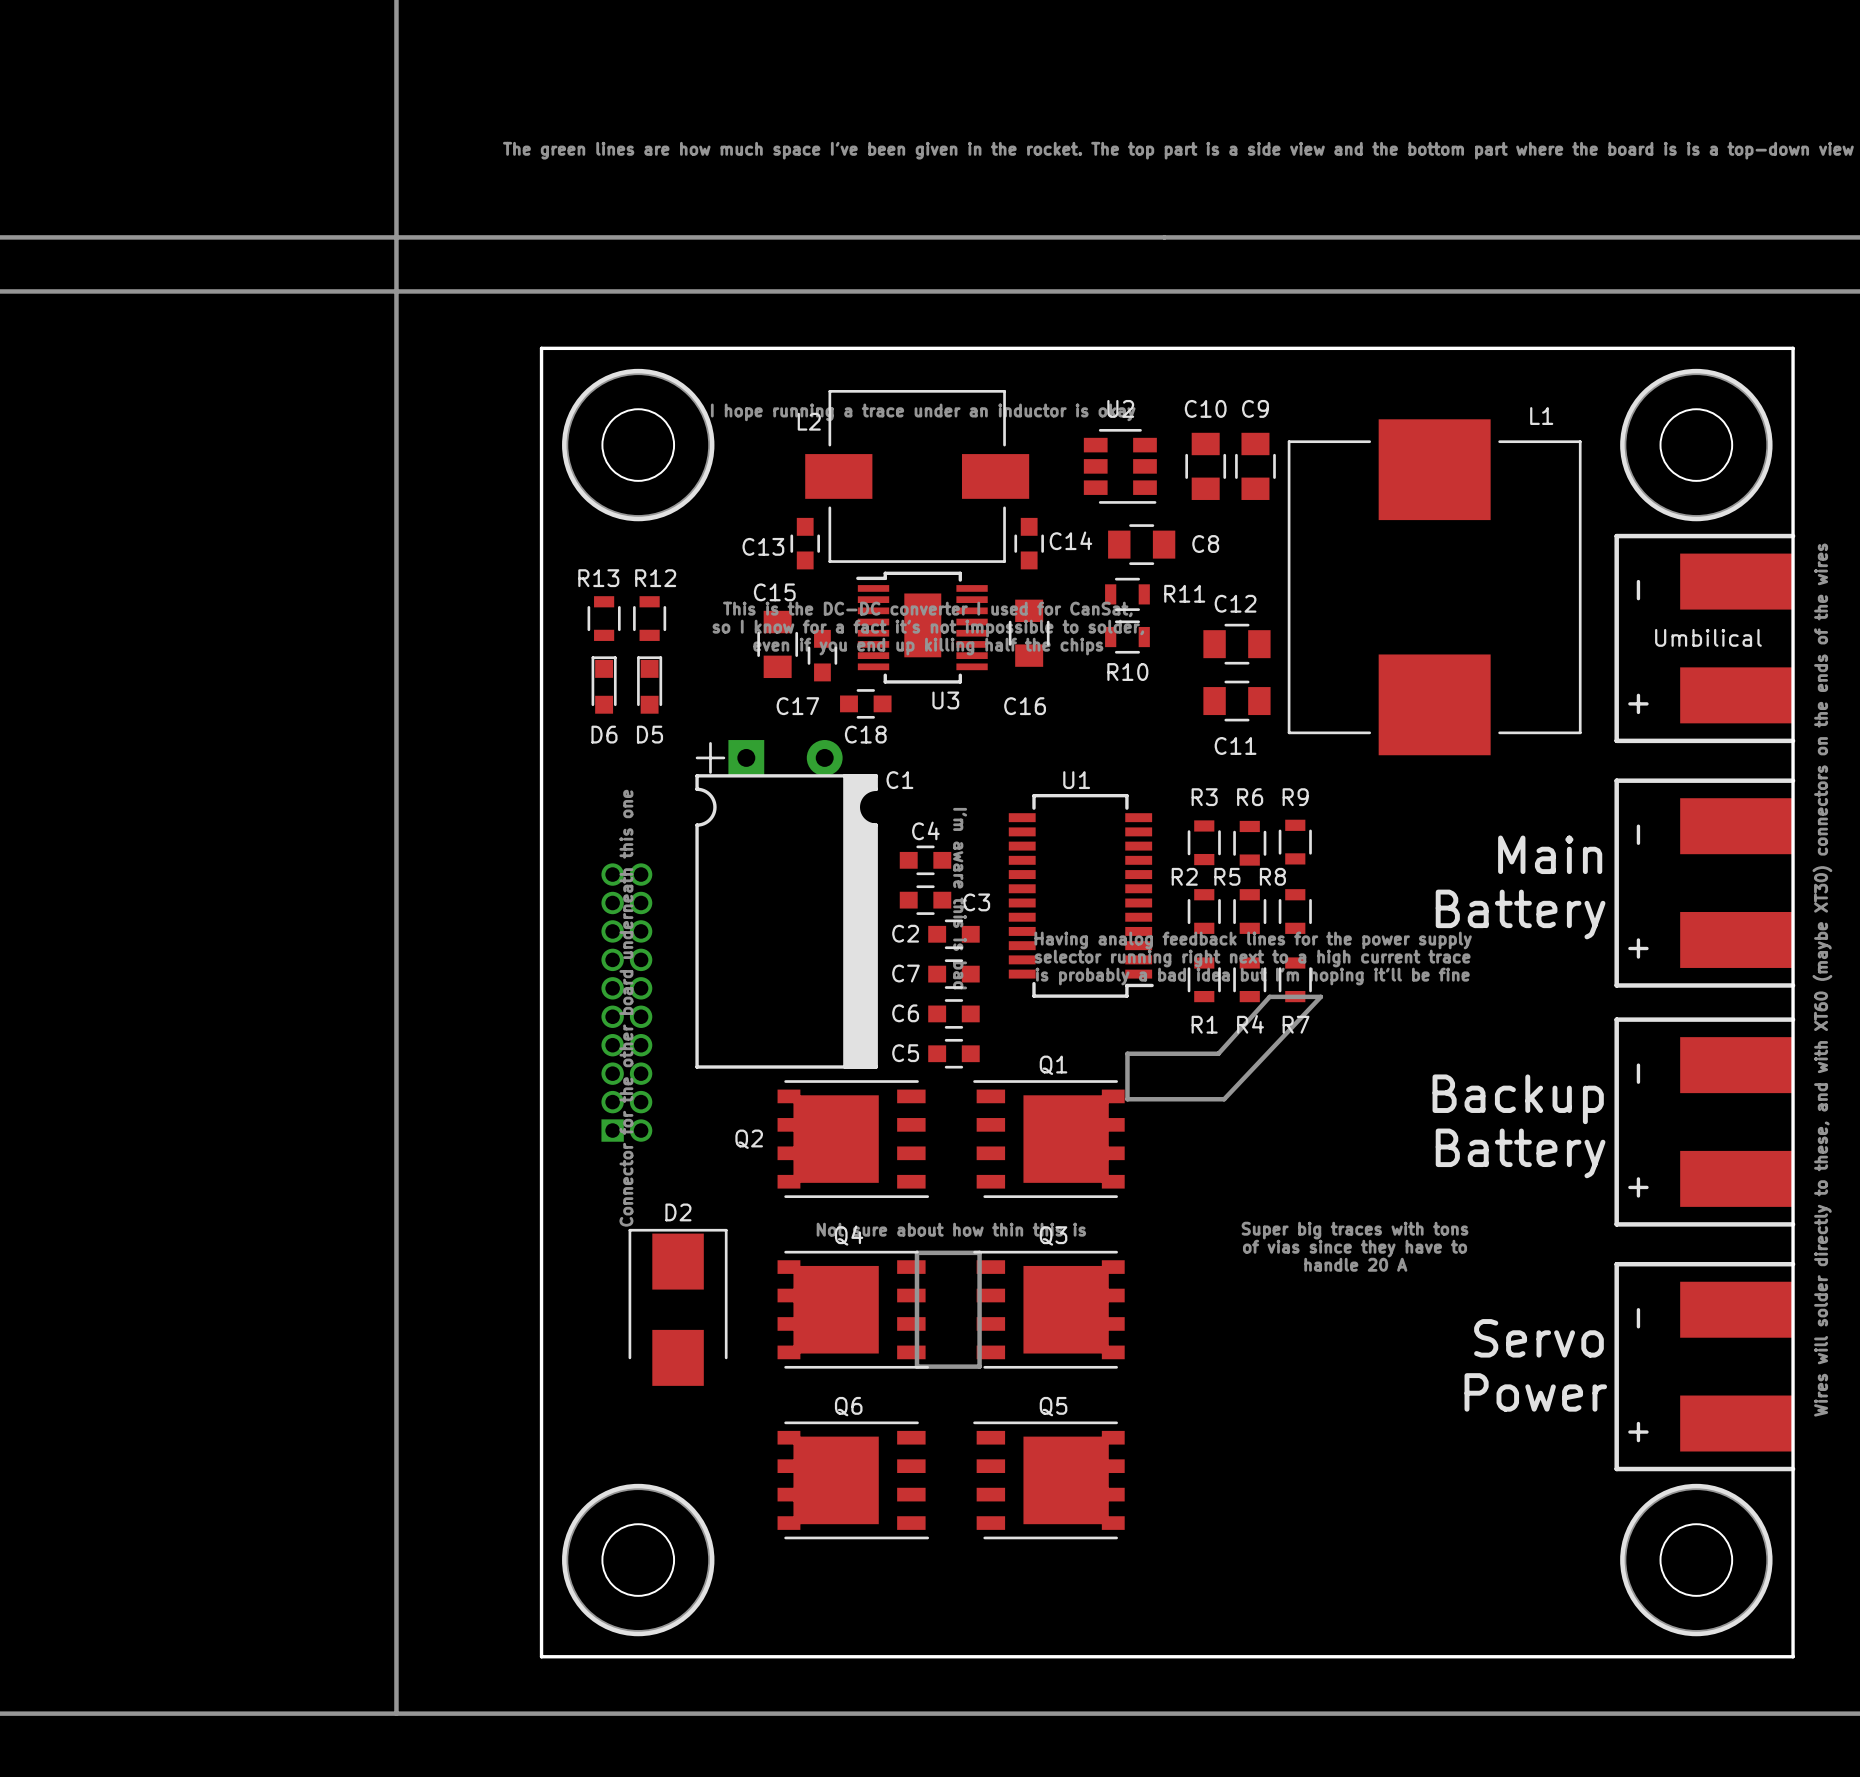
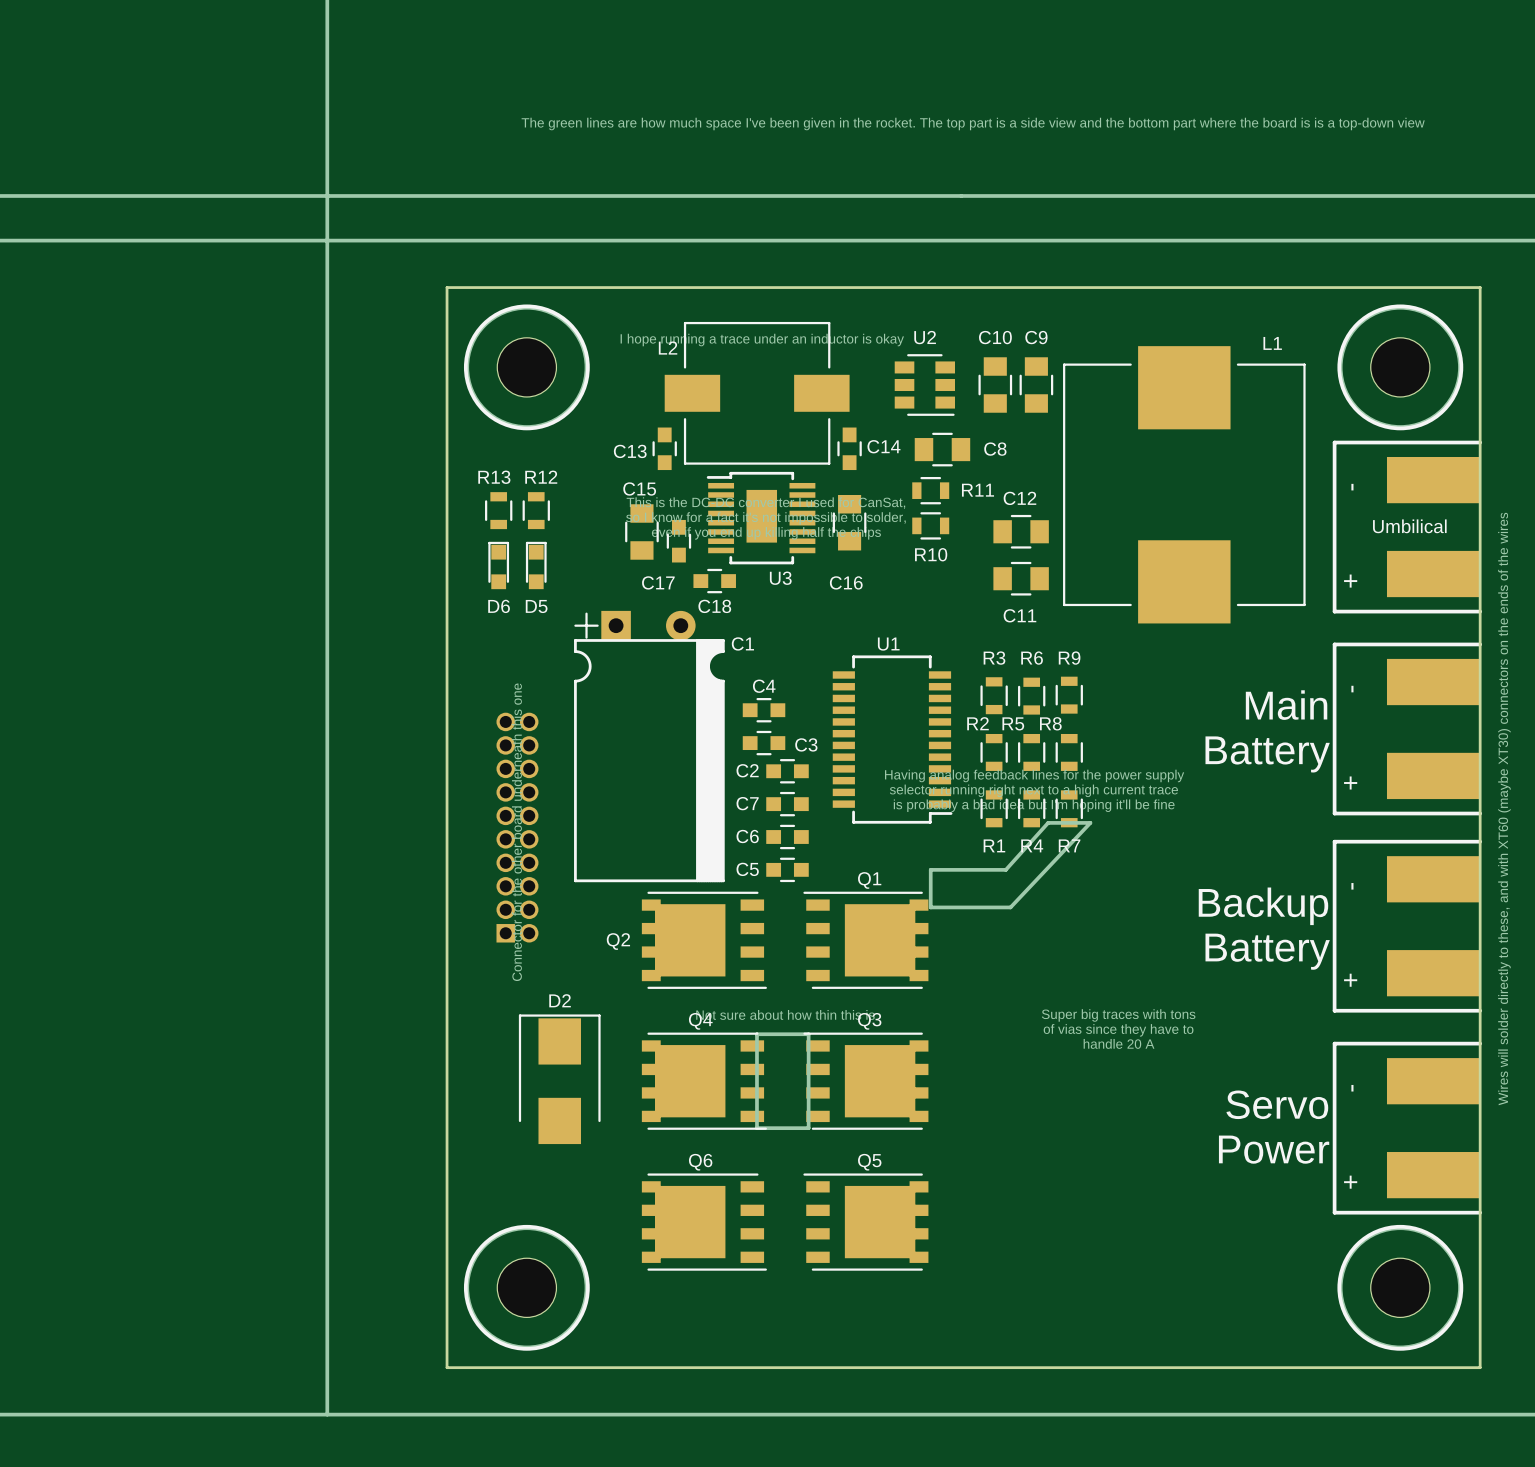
text: I'm aware this is bad (960, 898) -> none

